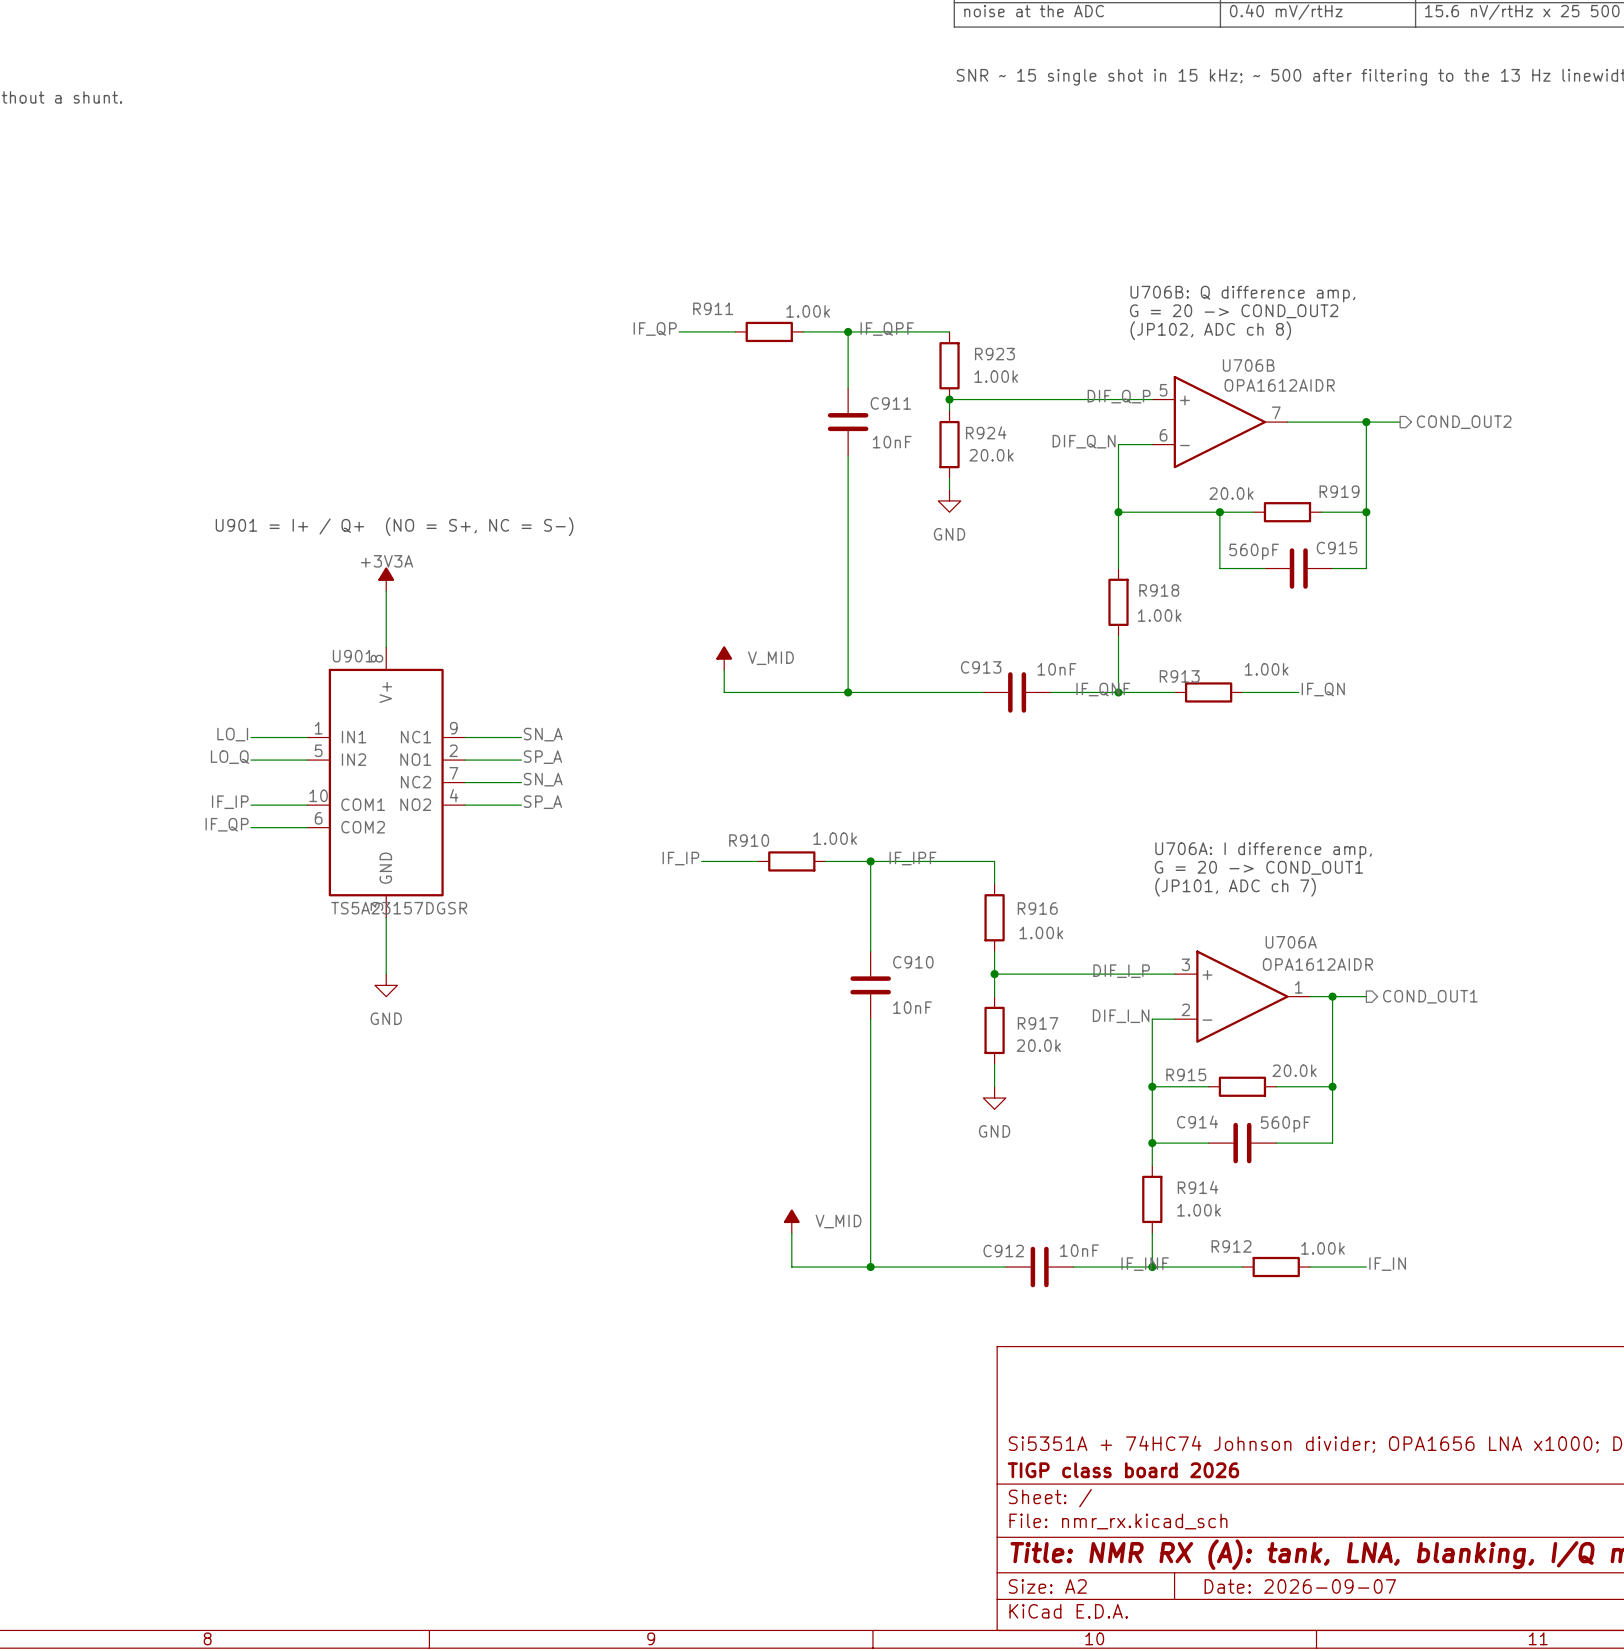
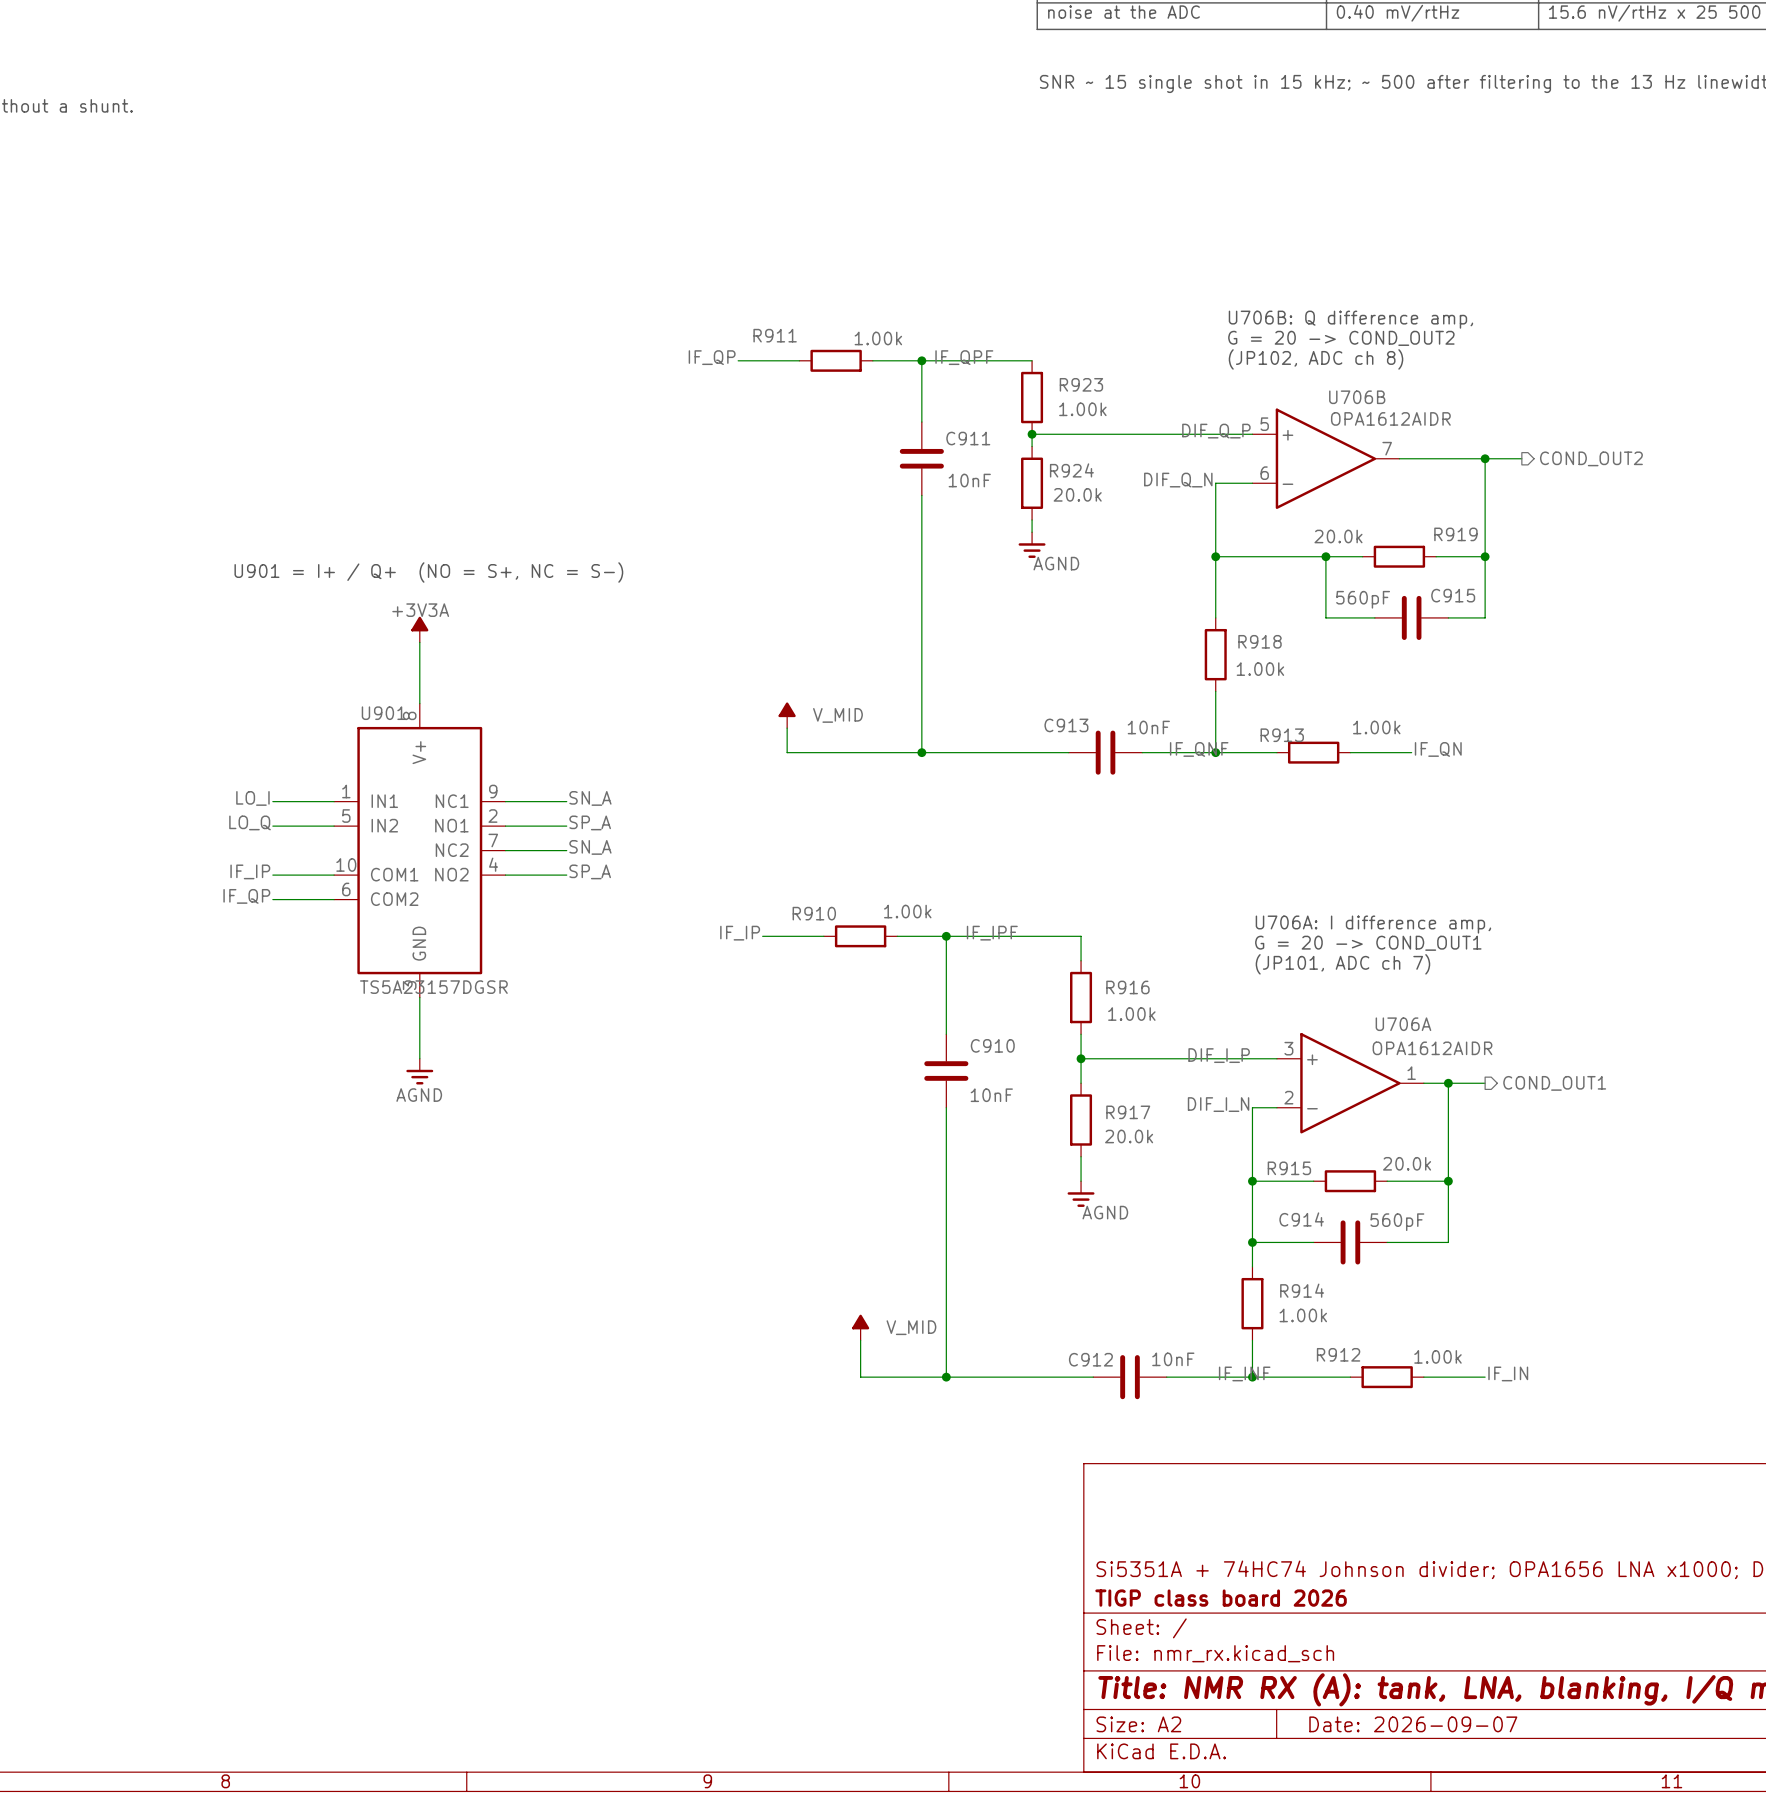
power symbol: GND (949, 500) -> AGND (1032, 545)
power symbol: GND (386, 985) -> AGND (419, 1071)
power symbol: GND (994, 1098) -> AGND (1081, 1194)

